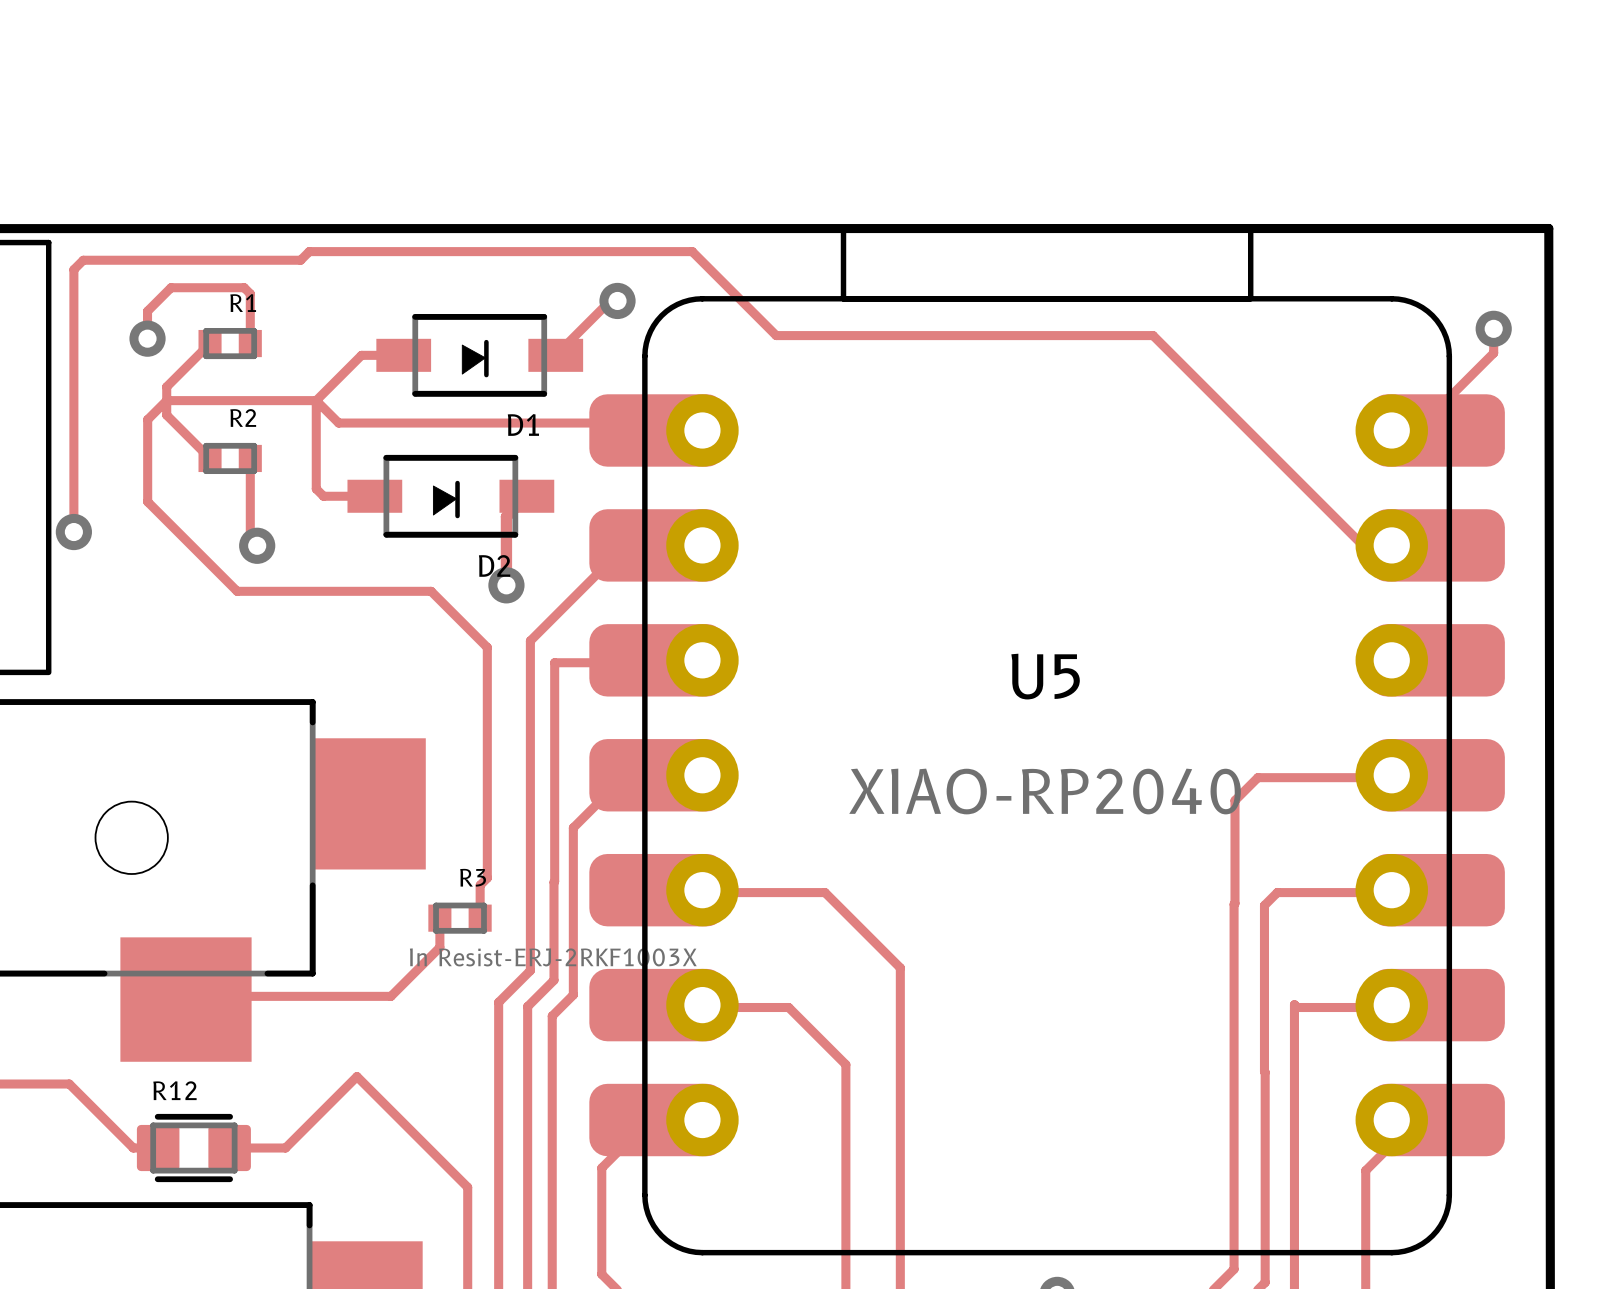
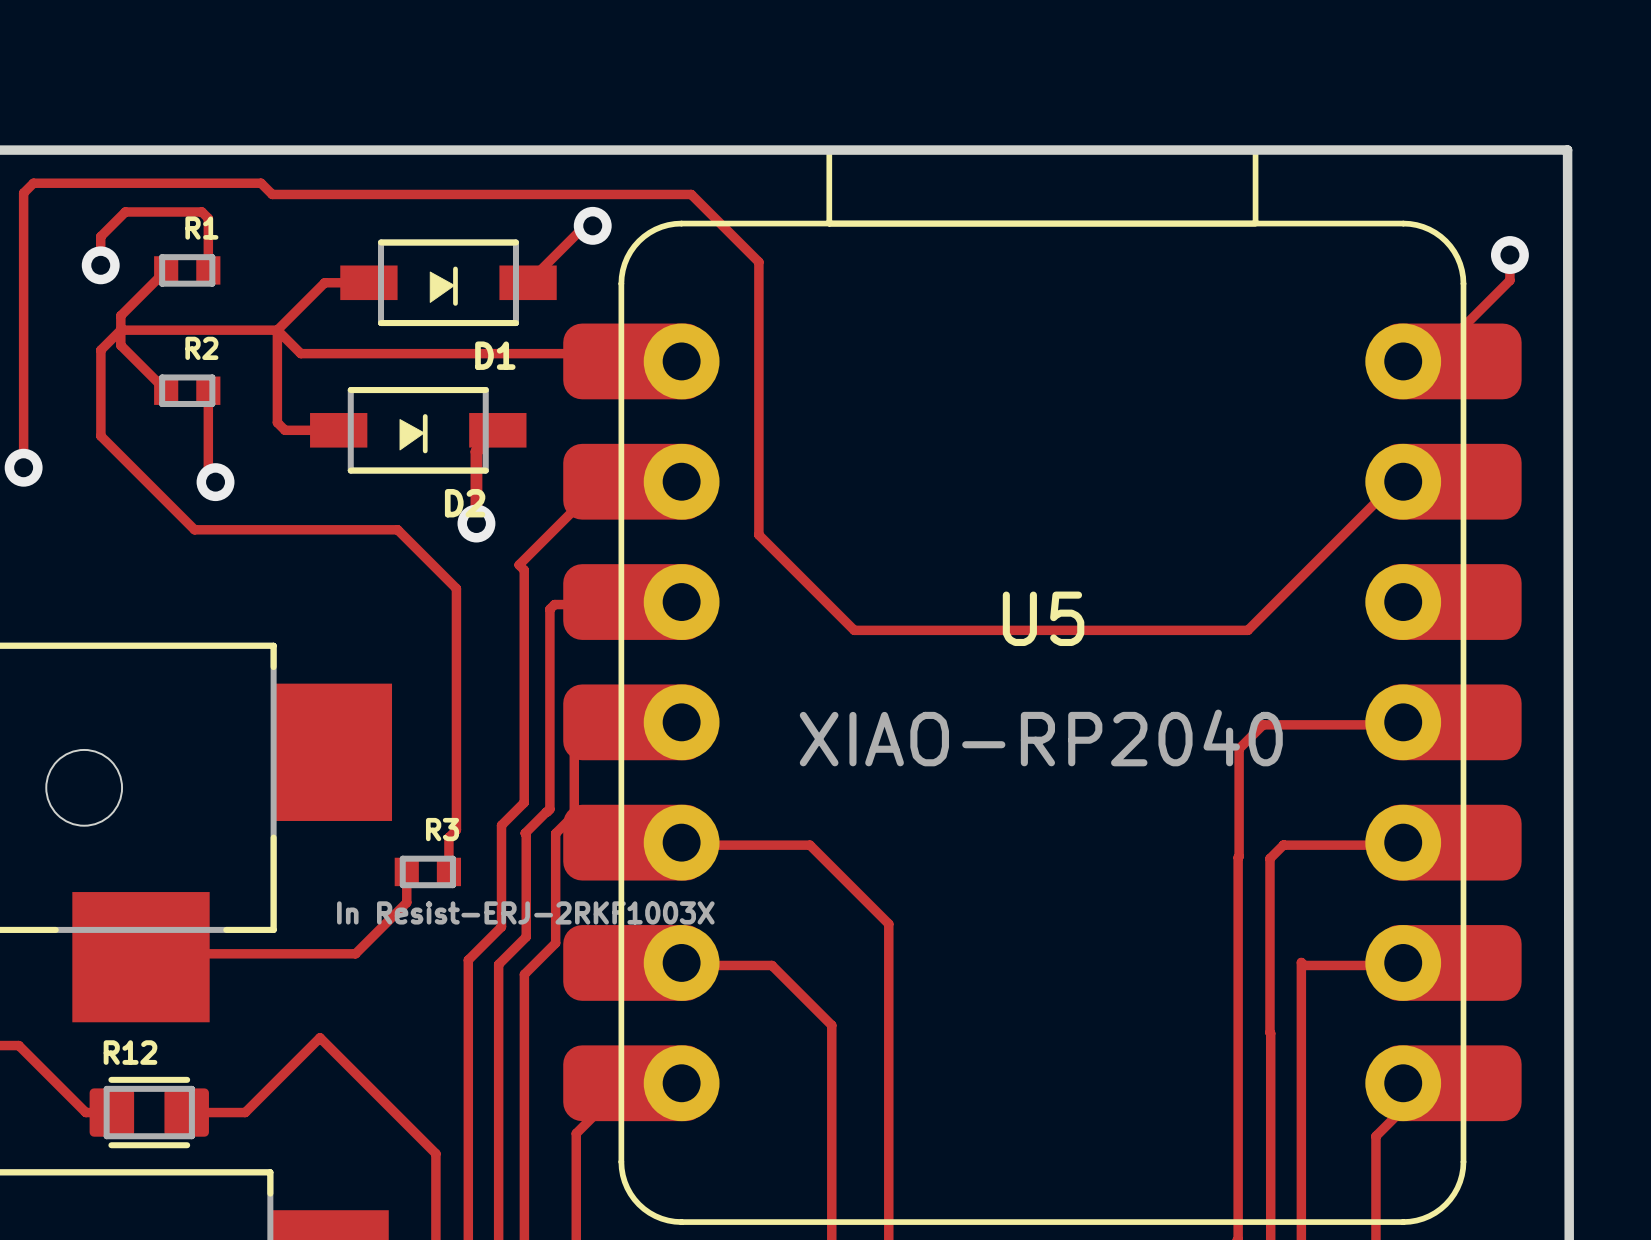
track: (300, 260) (309, 251) (692, 251) (711, 270) -> (261, 183) (272, 194) (691, 194)
track: (776, 335) (1153, 335) (1365, 547) (1382, 547) -> (758, 262) (758, 534) (854, 630) (1247, 630) (1393, 484) (1426, 484)
track: (623, 547) (530, 640) (530, 873) -> (599, 484) (519, 564) (524, 570) (524, 802) (501, 825)
track: (581, 662) (554, 662) (553, 882) -> (554, 604) (549, 609) (549, 809) (547, 811)
track: (702, 775) (625, 775) (573, 827) (573, 994) -> (574, 726) (574, 814) (555, 833) (555, 943) (546, 952)
track: none -> (546, 811) (525, 833) (526, 834)

